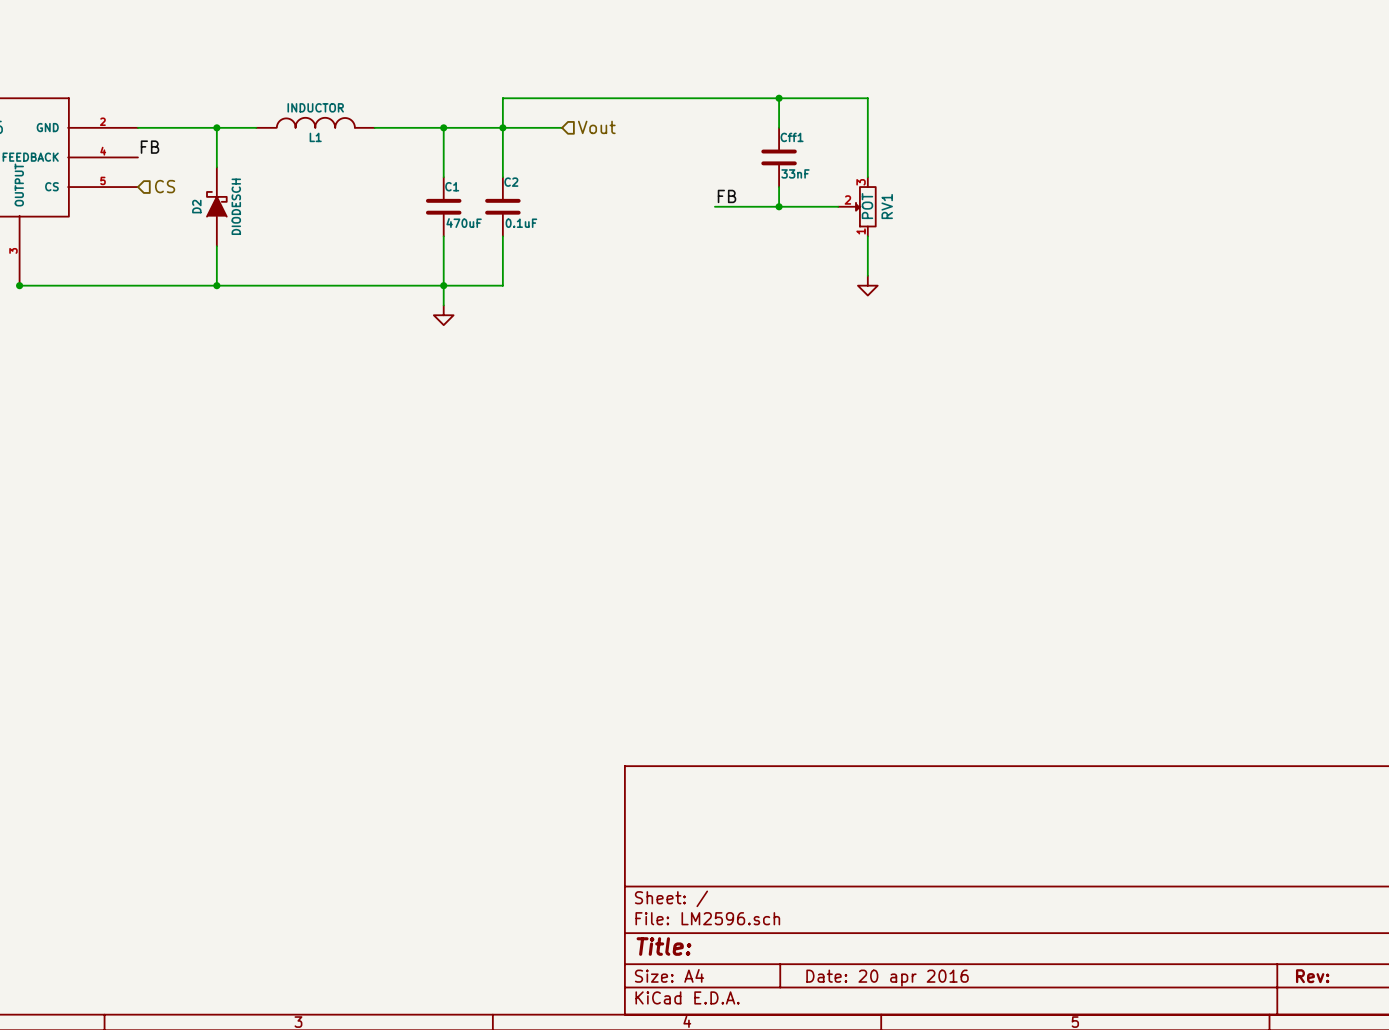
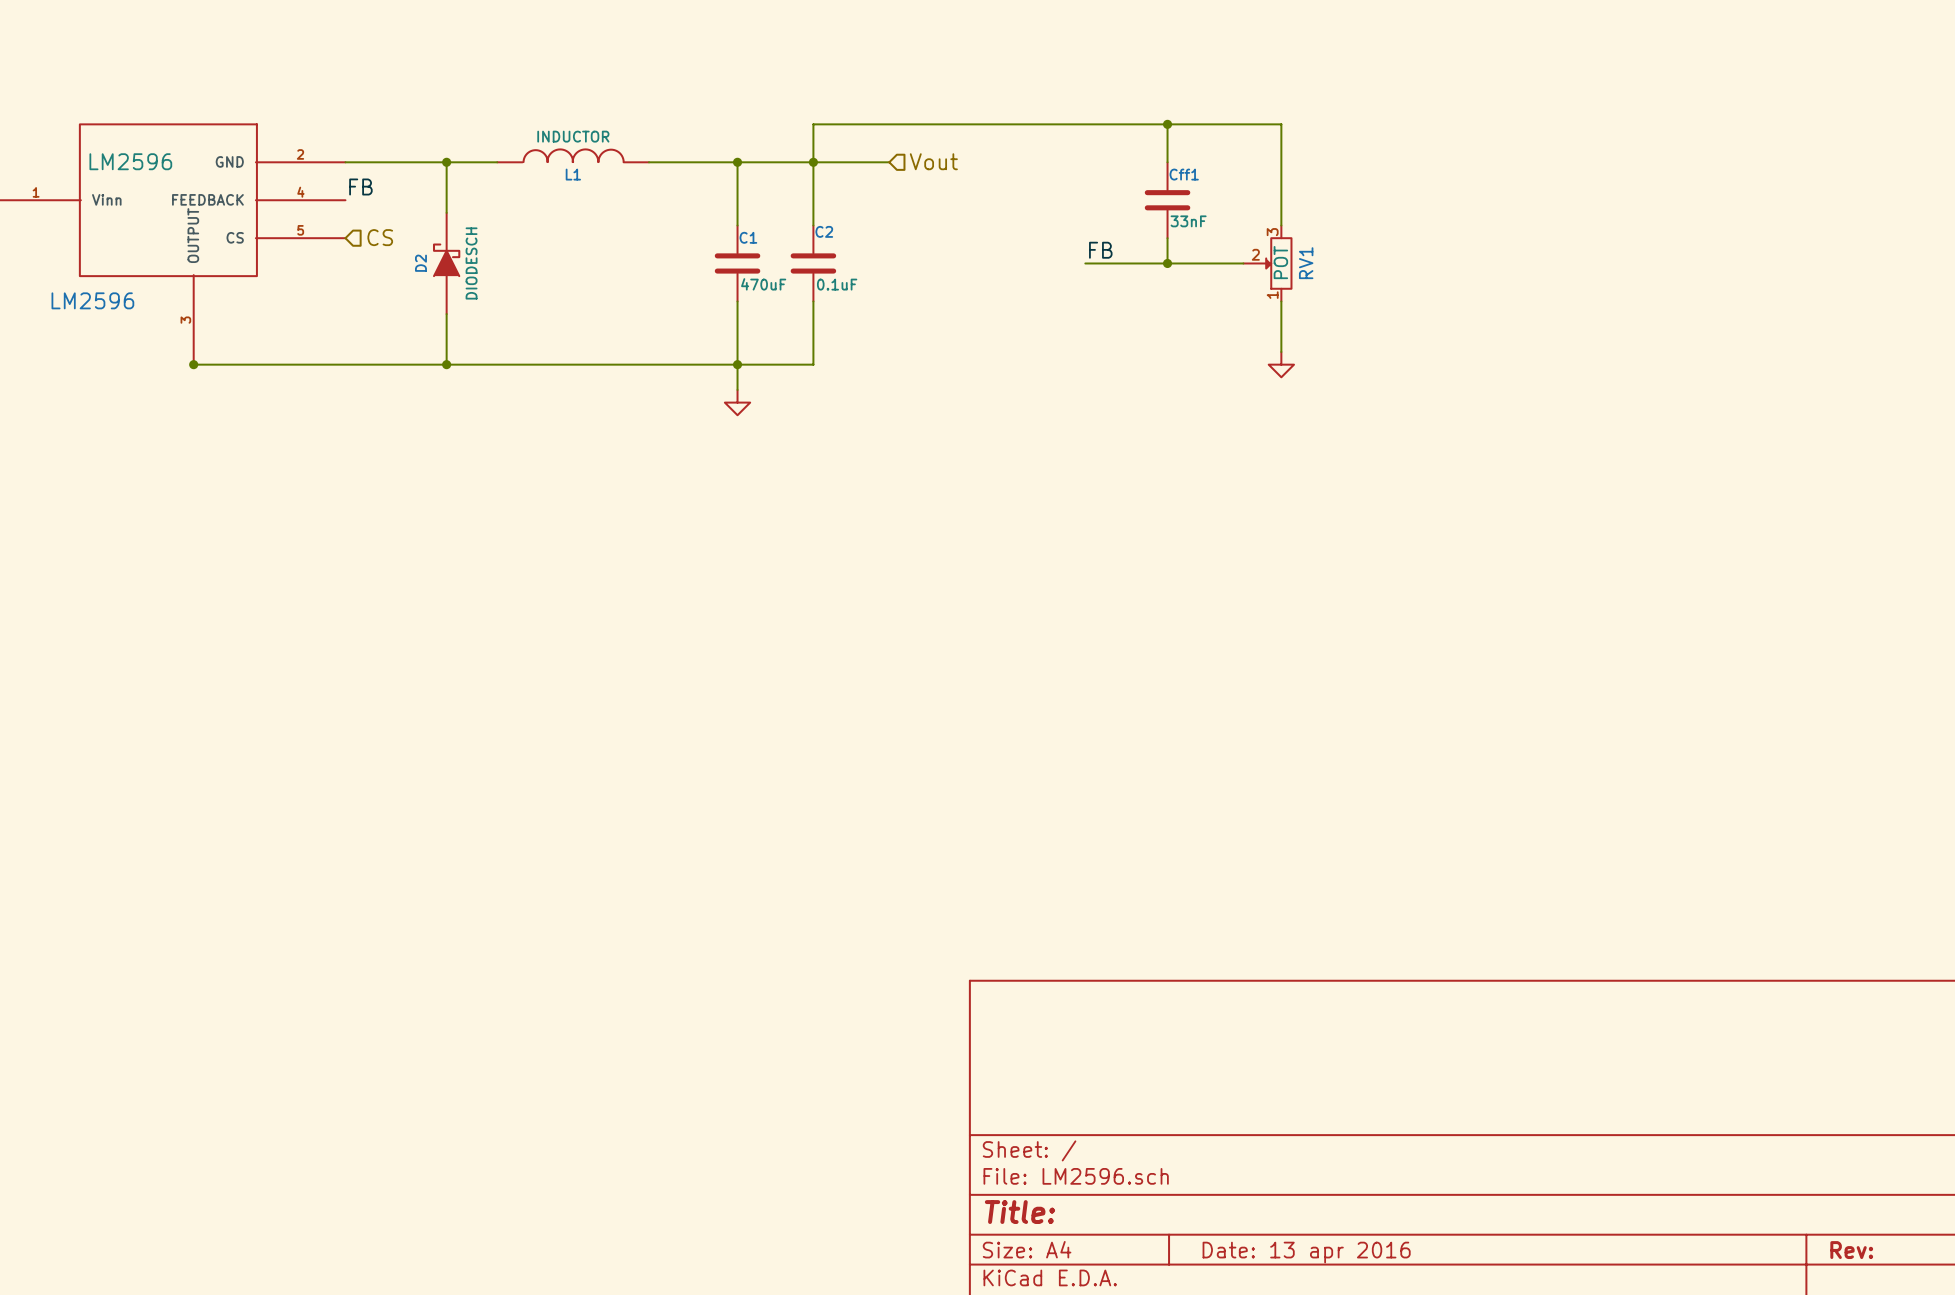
title block: Date: 20 apr 2016 (887, 978) -> Date: 13 apr 2016 (1306, 1252)

